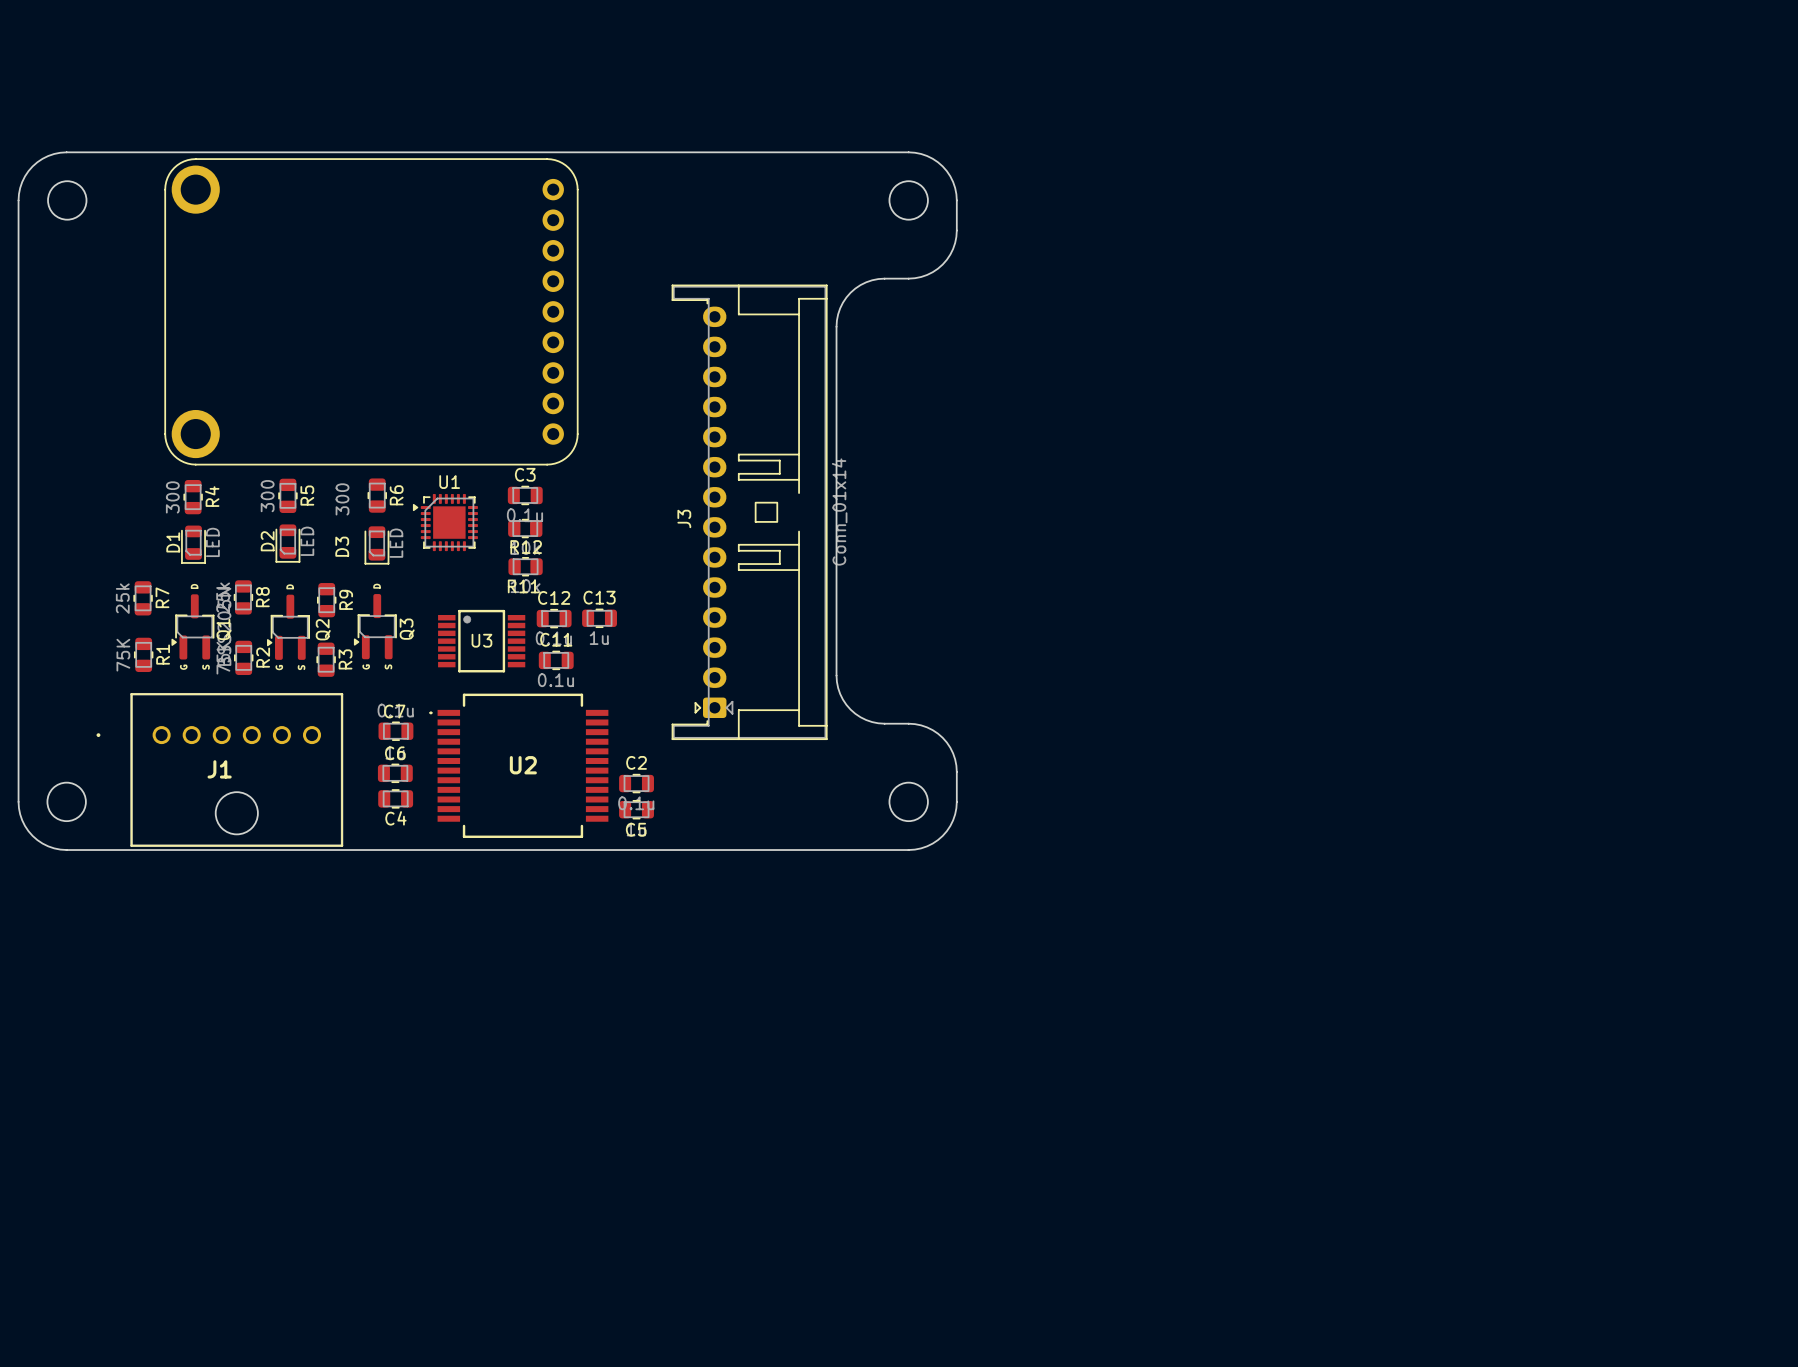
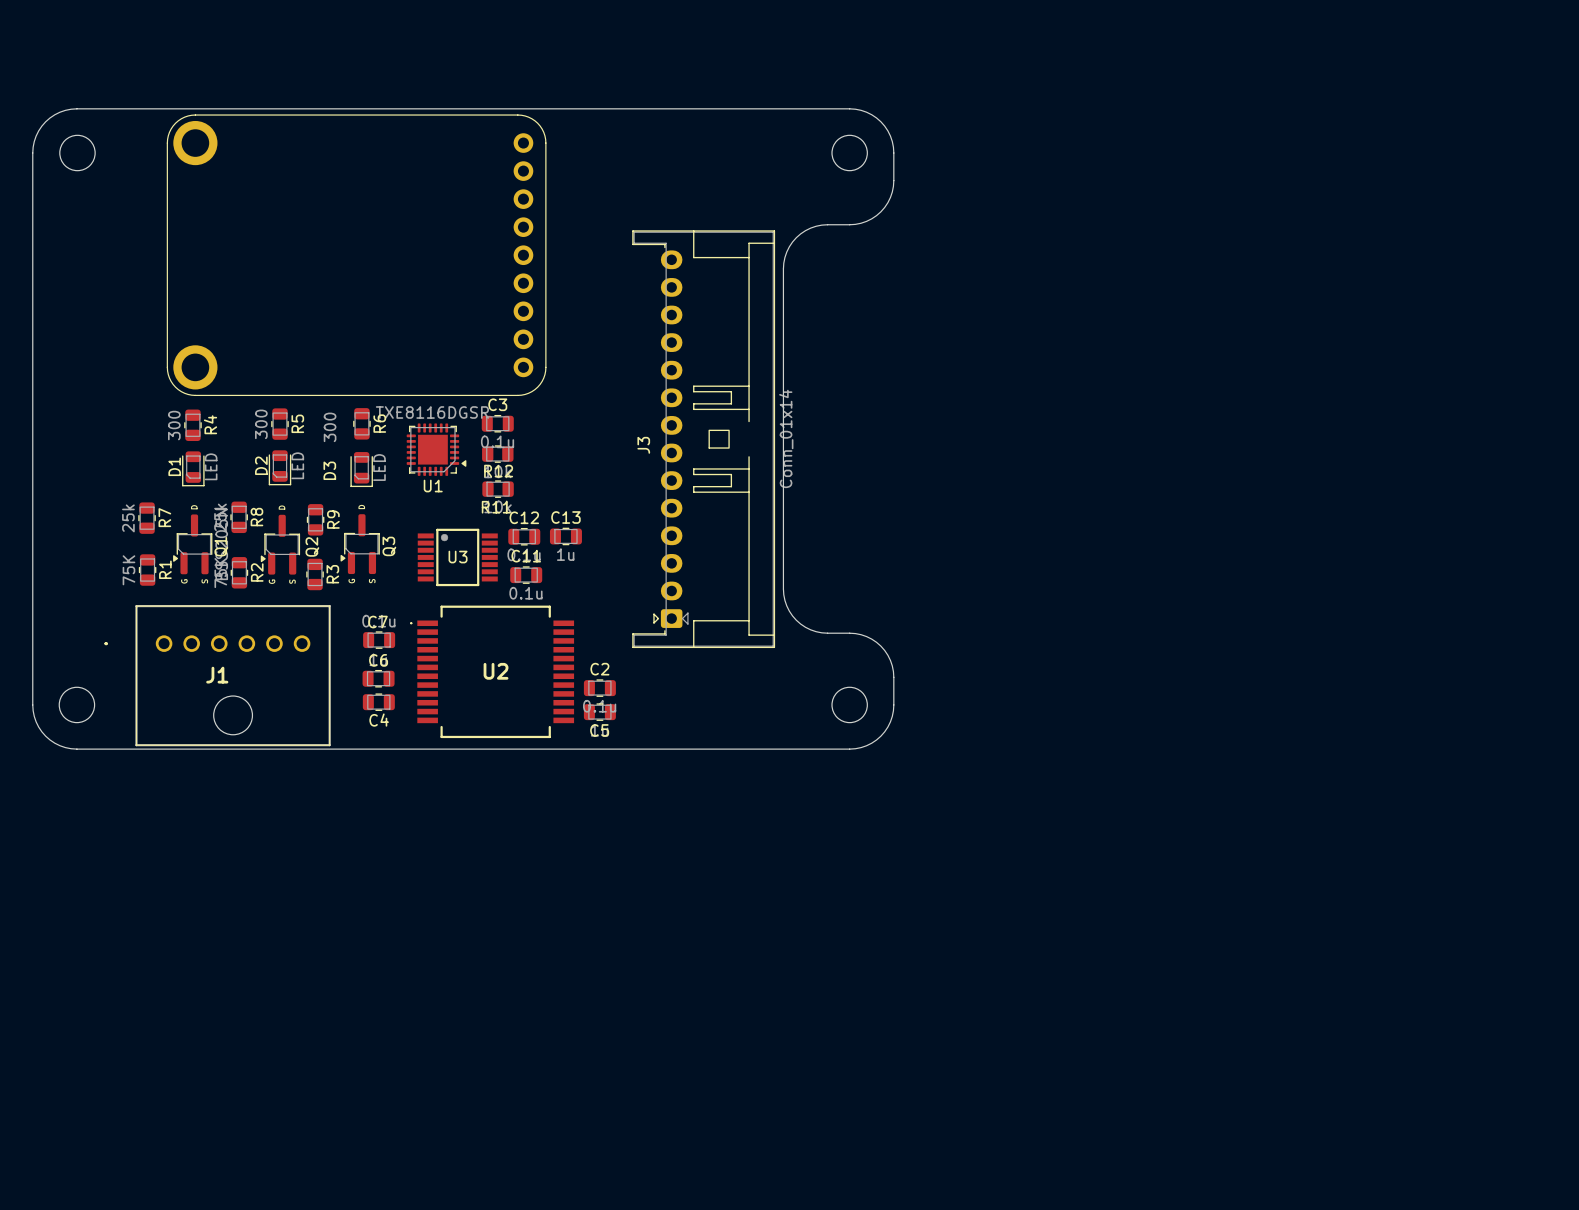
U1 value: none -> TXE8116DGSR (432, 412)
U1 rotation: 0° (445, 522) -> 180° (436, 449)

